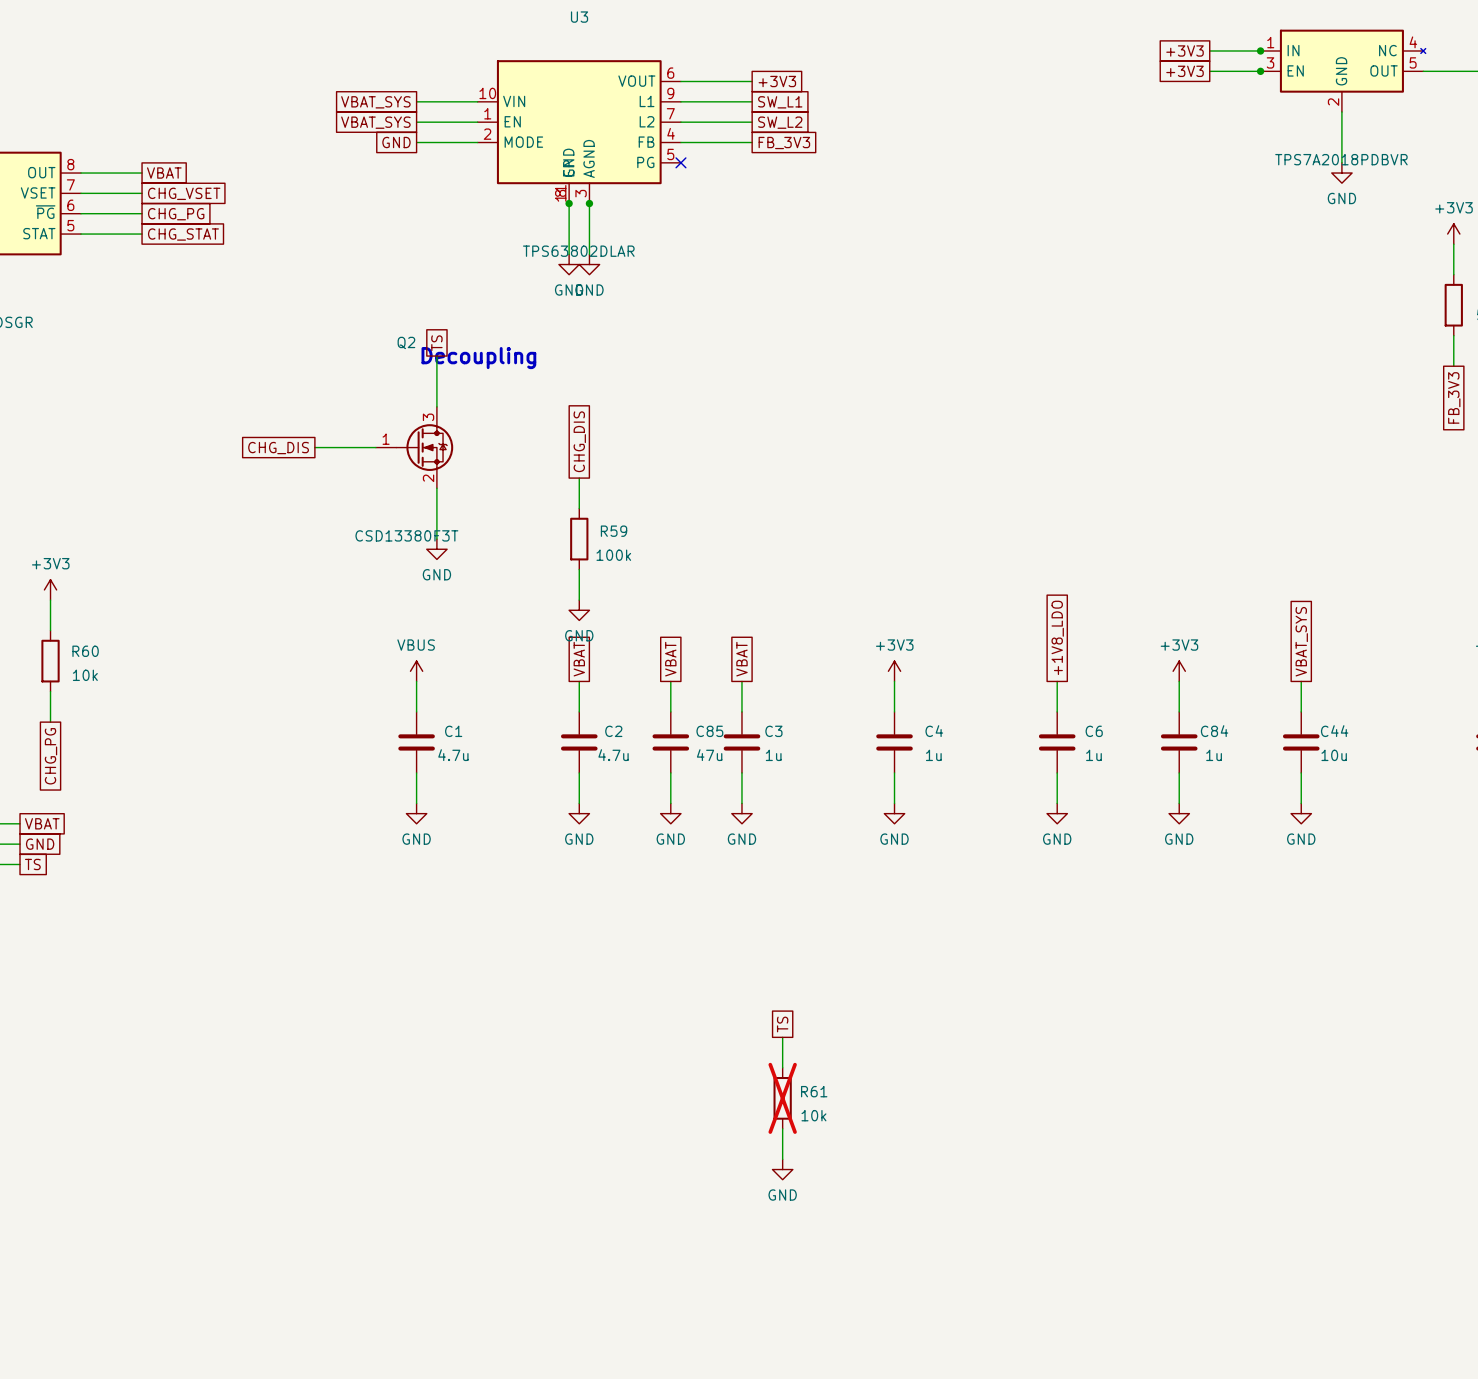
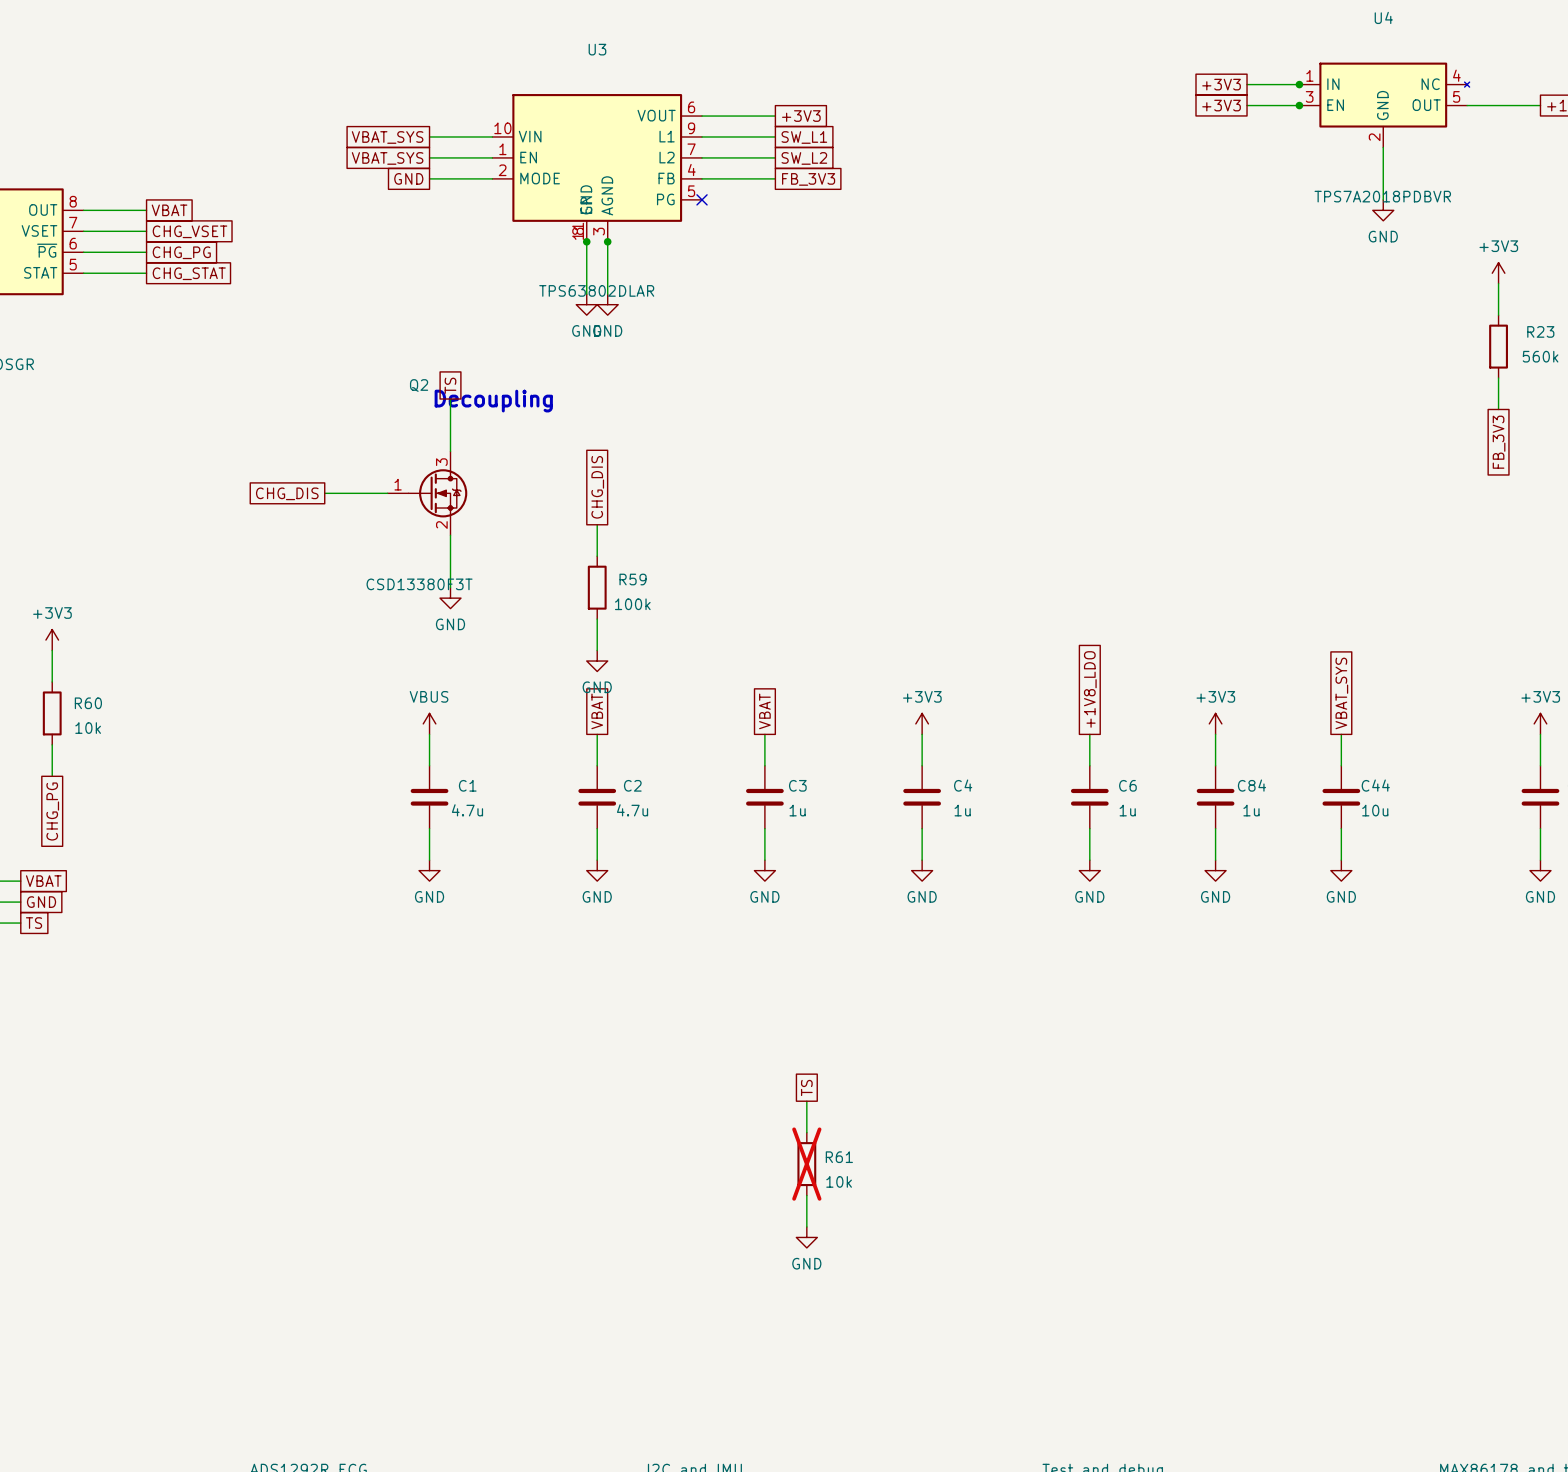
global label: VBAT (670, 659) -> none
wire: (670, 681) (670, 711) -> none
C85: 47u (670, 742) -> none
wire: (670, 772) (670, 803) -> none
power symbol: GND (670, 813) -> none

